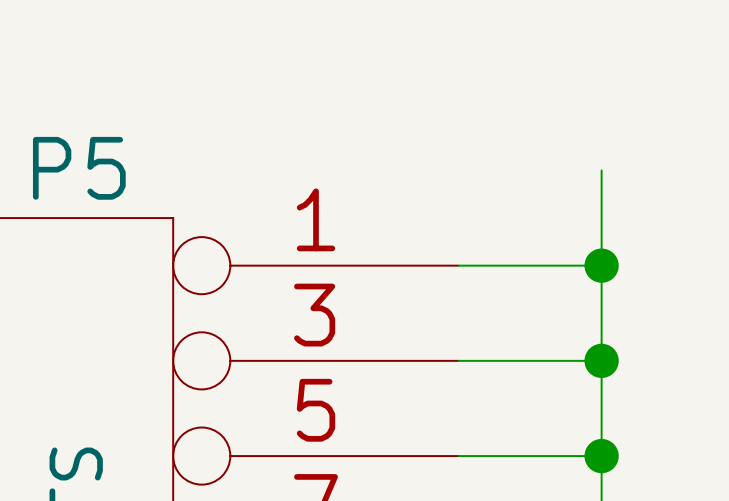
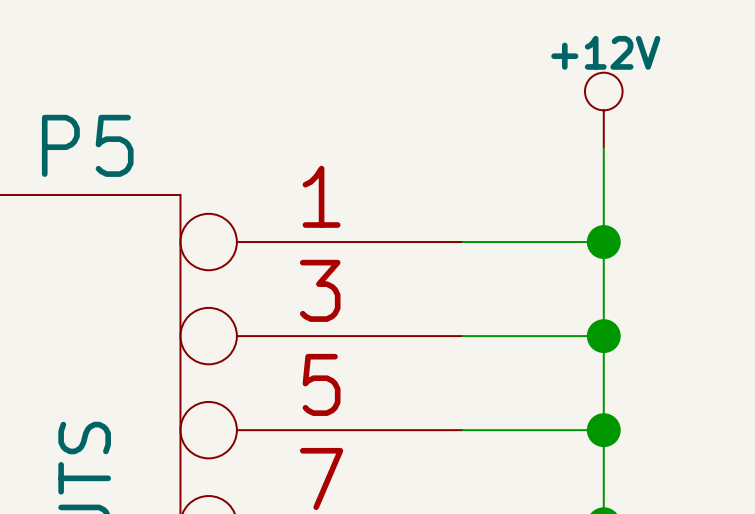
power symbol: none -> +12V (603, 110)

